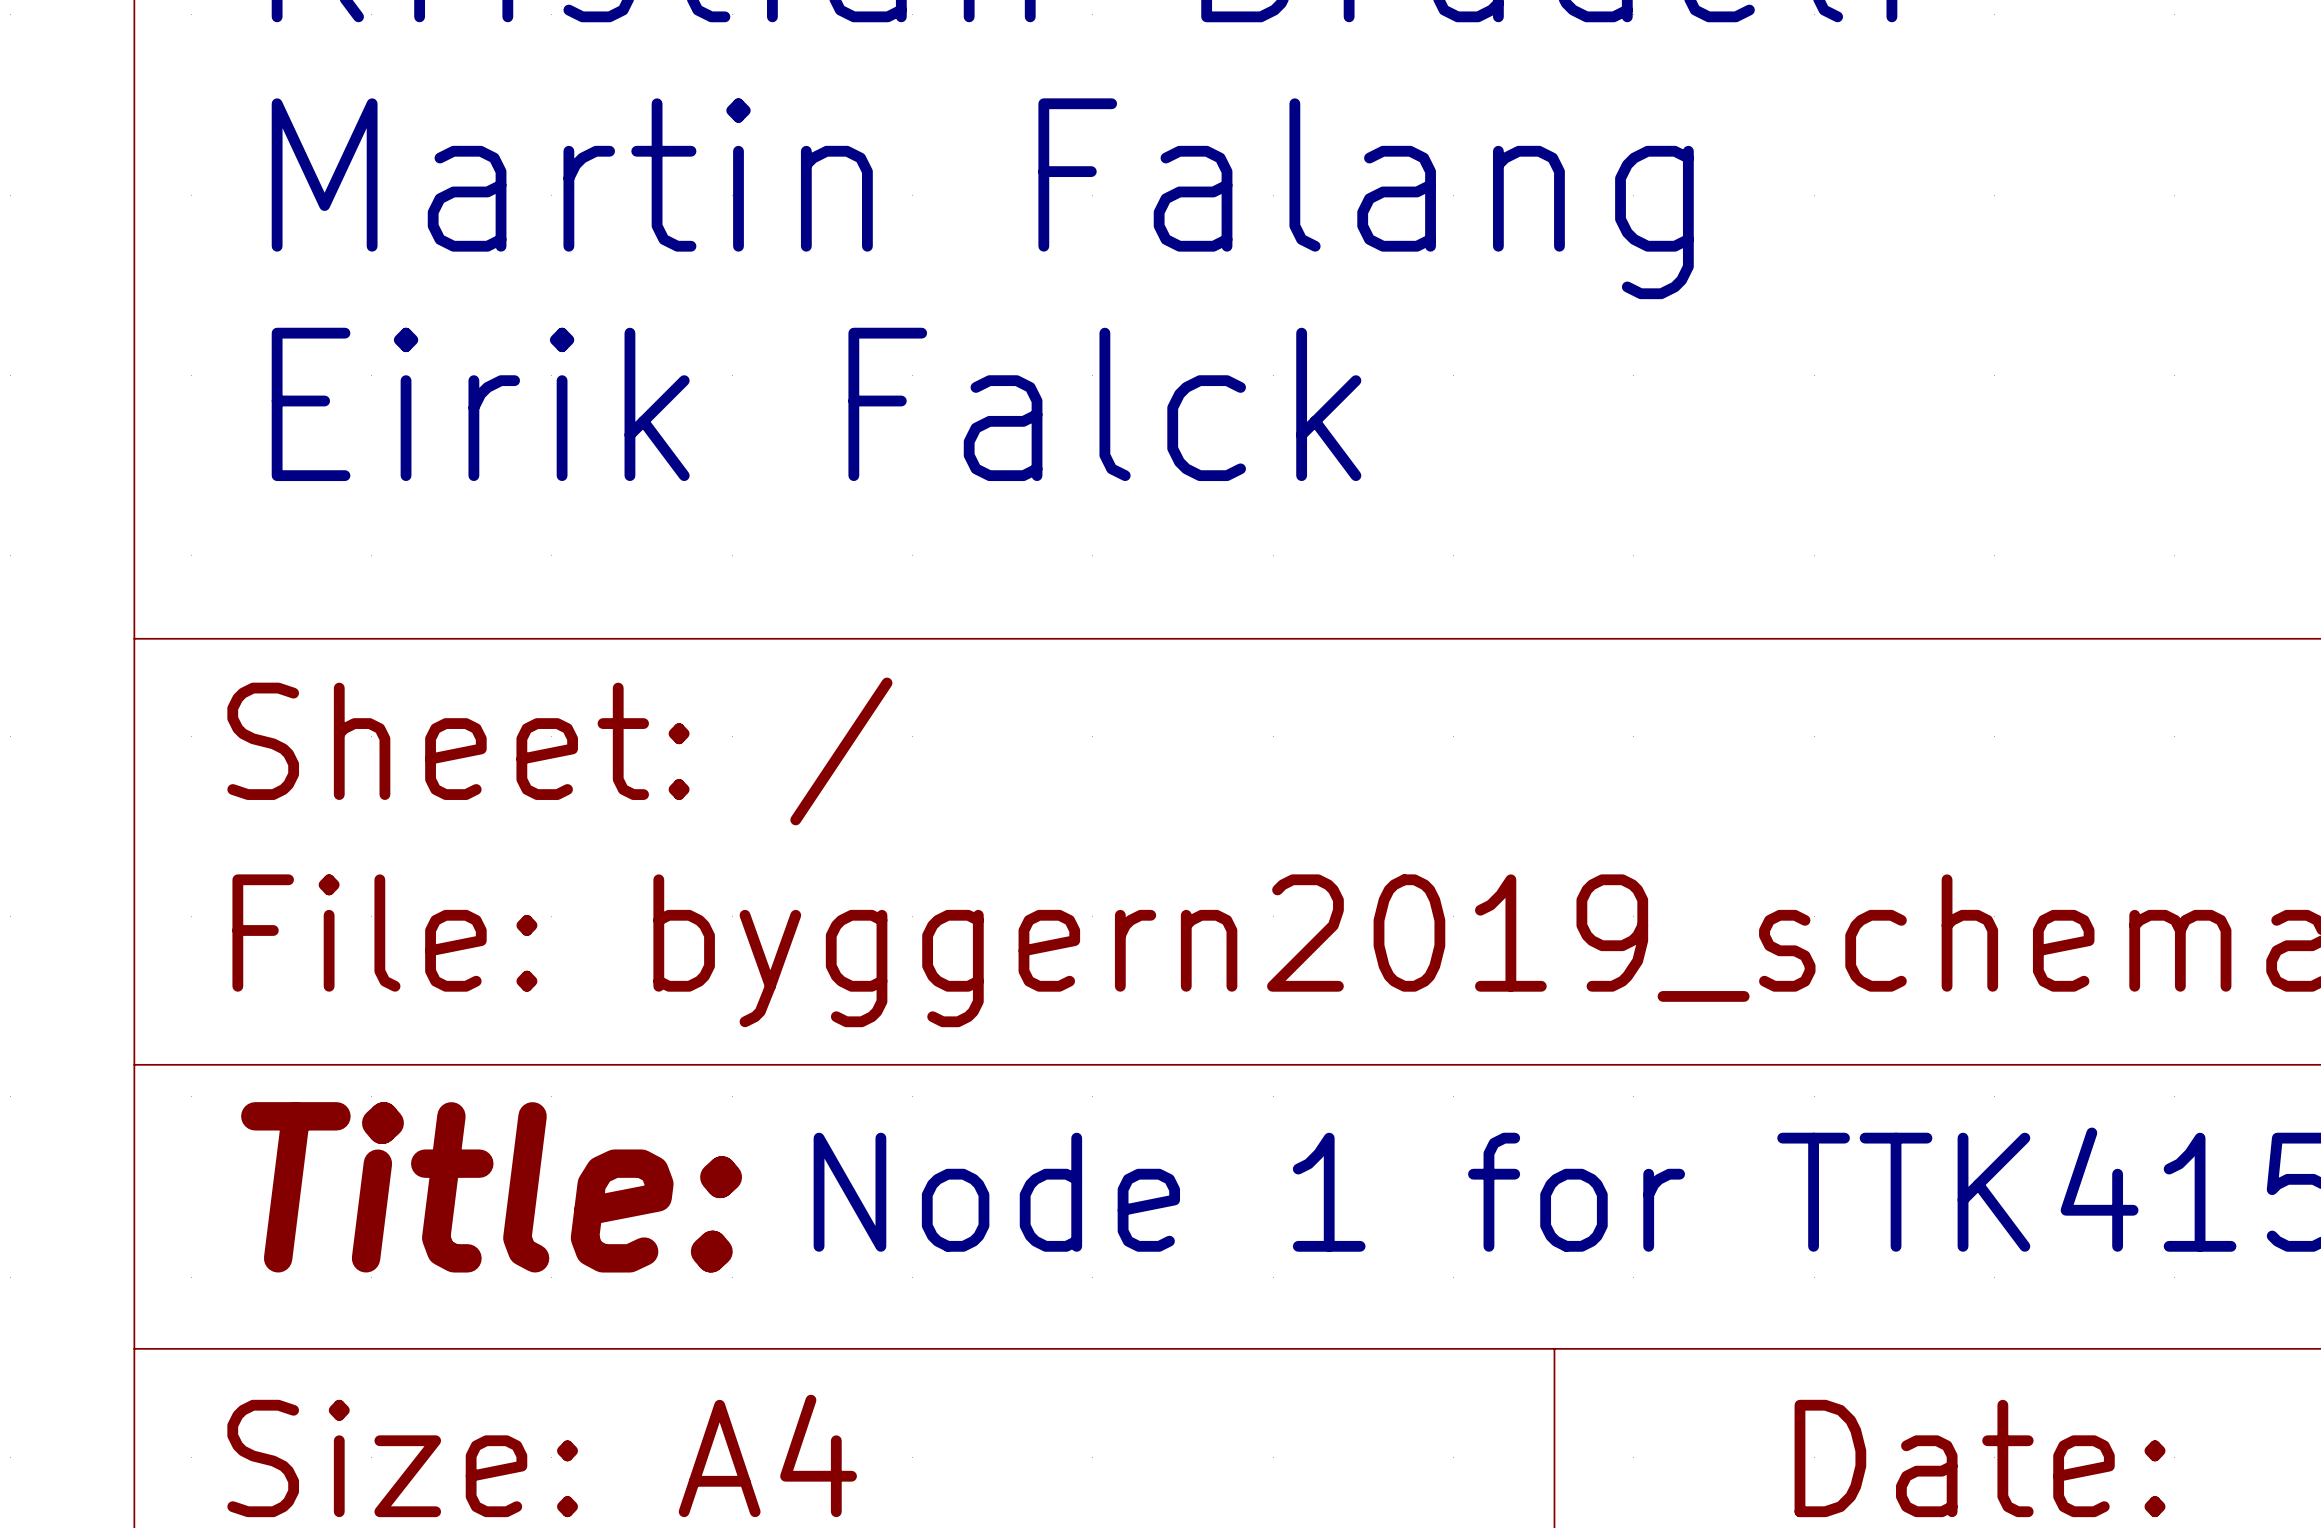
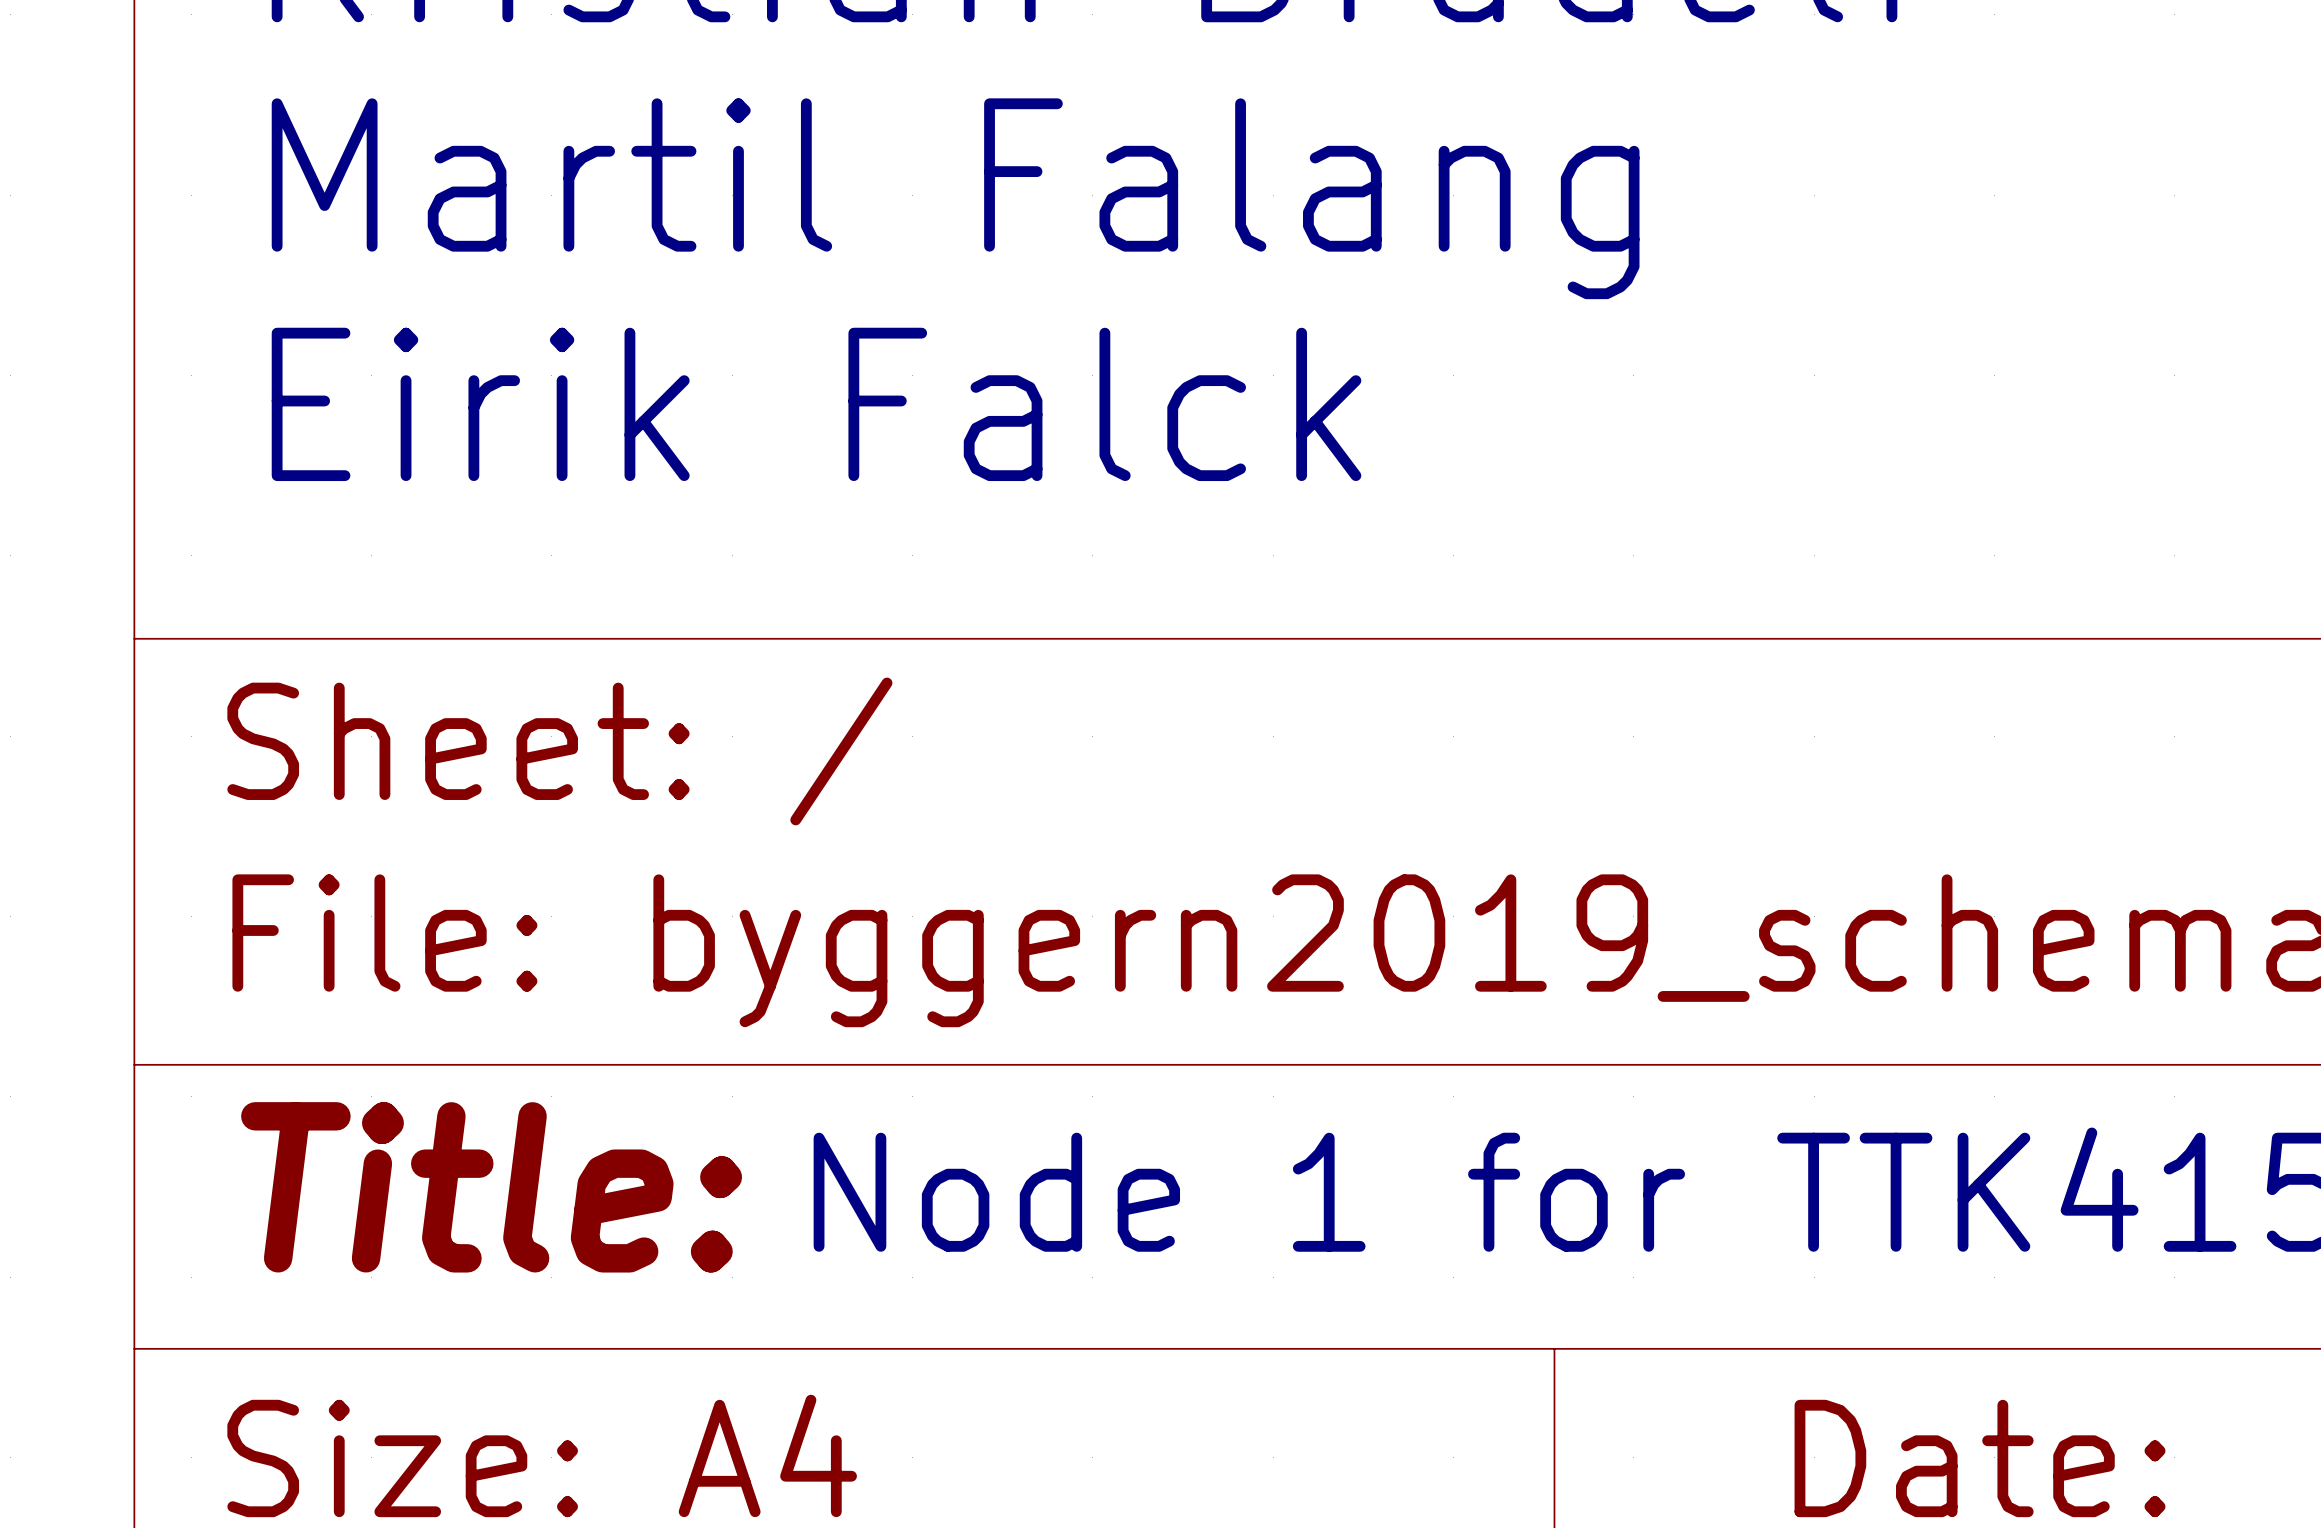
text: Martin Falang (982, 198) -> Martil Falang (955, 198)

